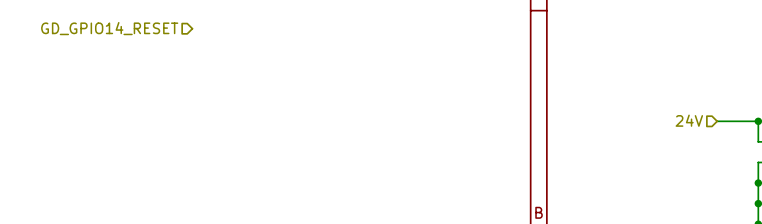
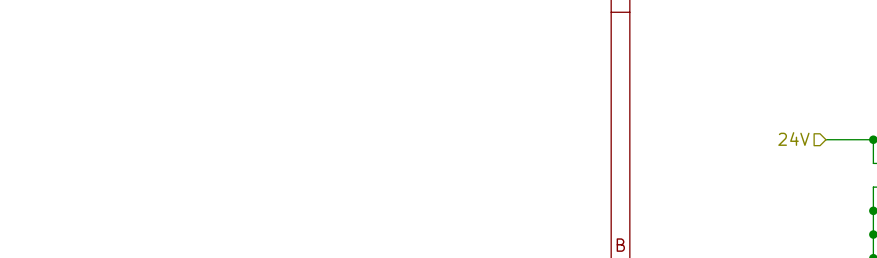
hierarchical label: GD_GPIO14_RESET (109, 28) -> none

